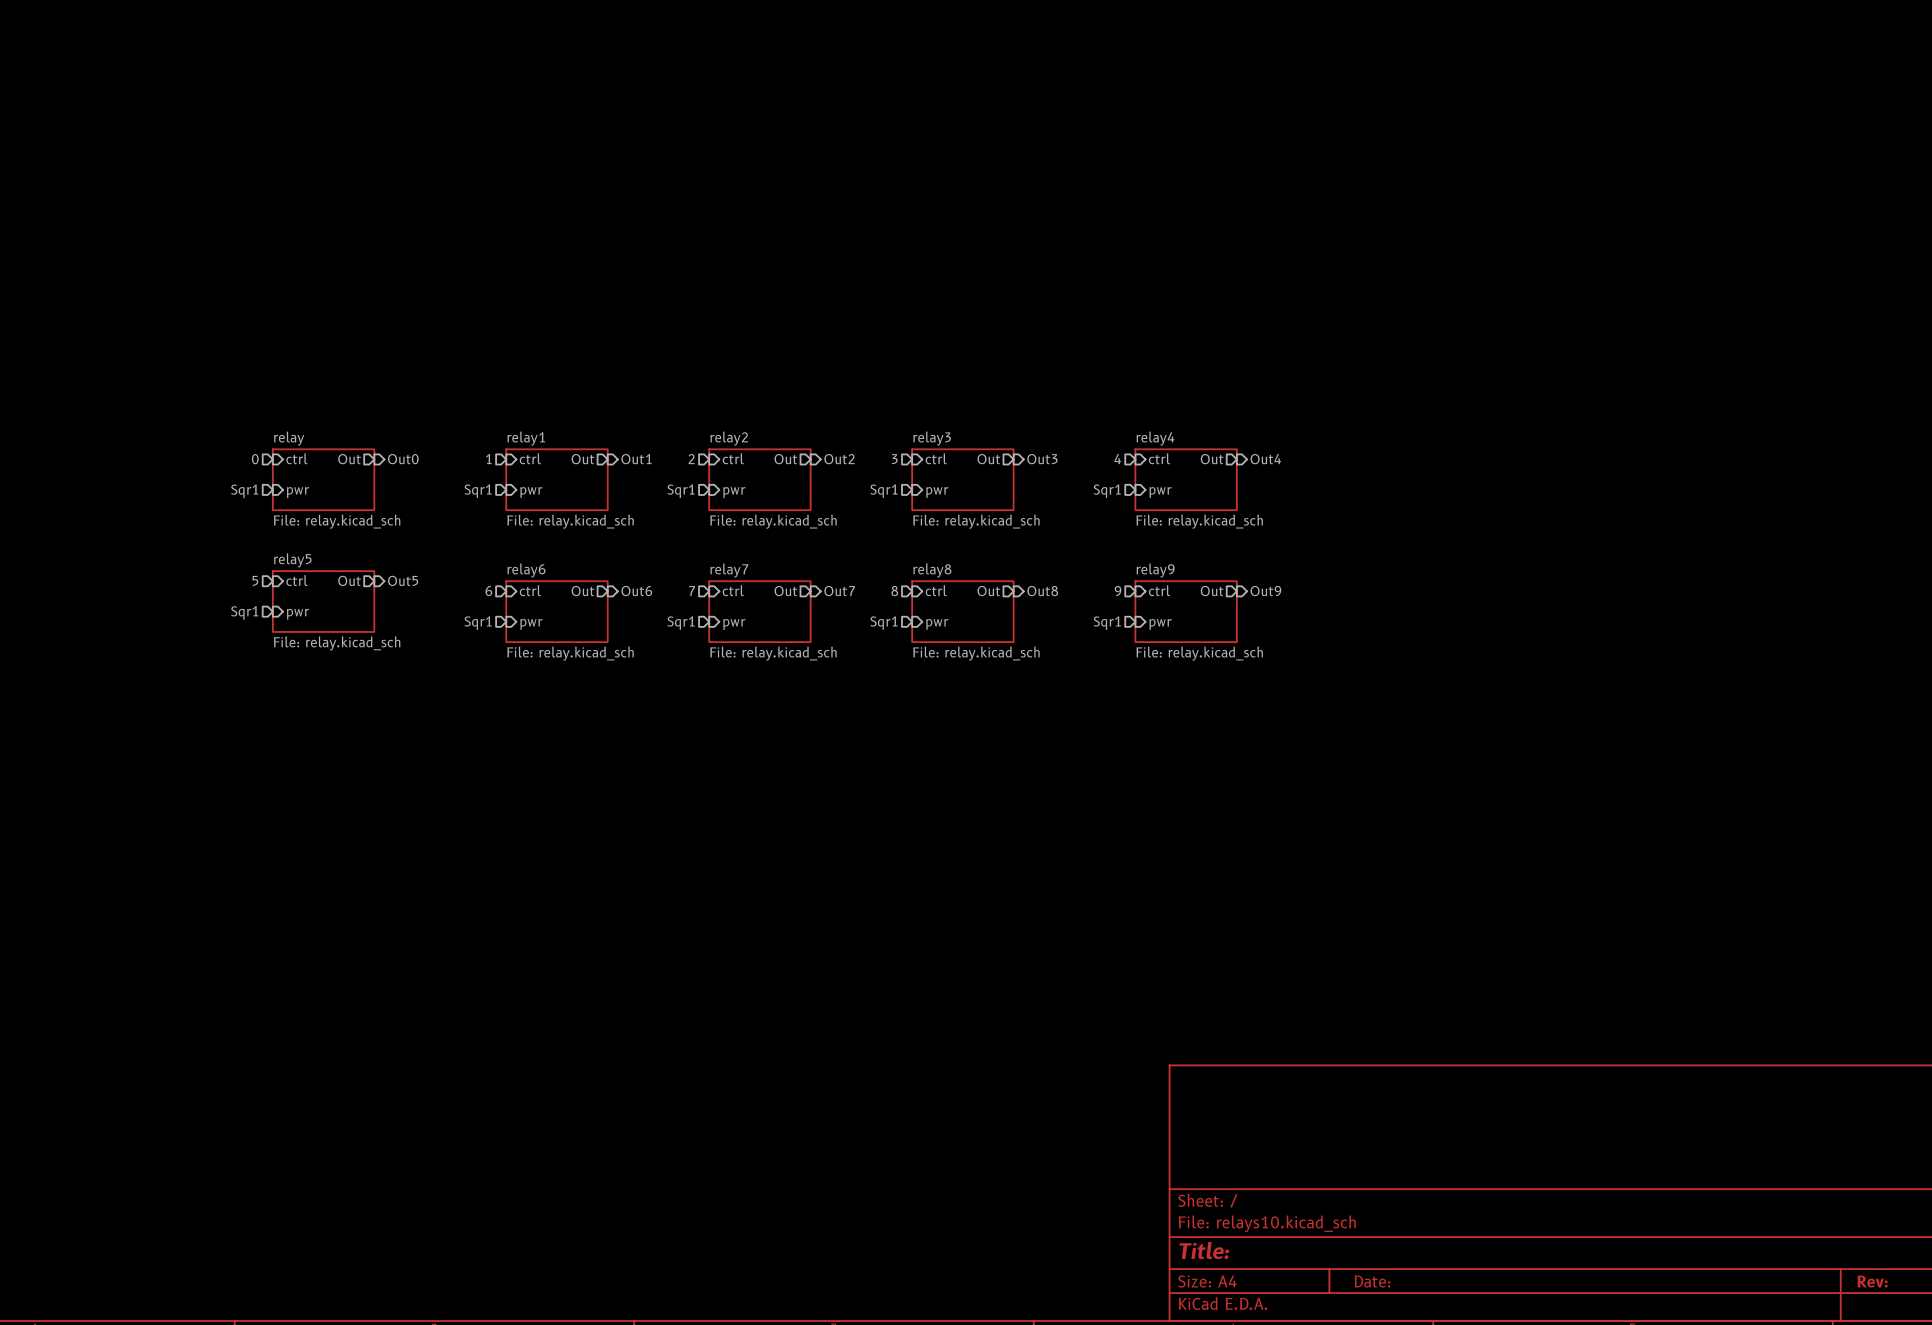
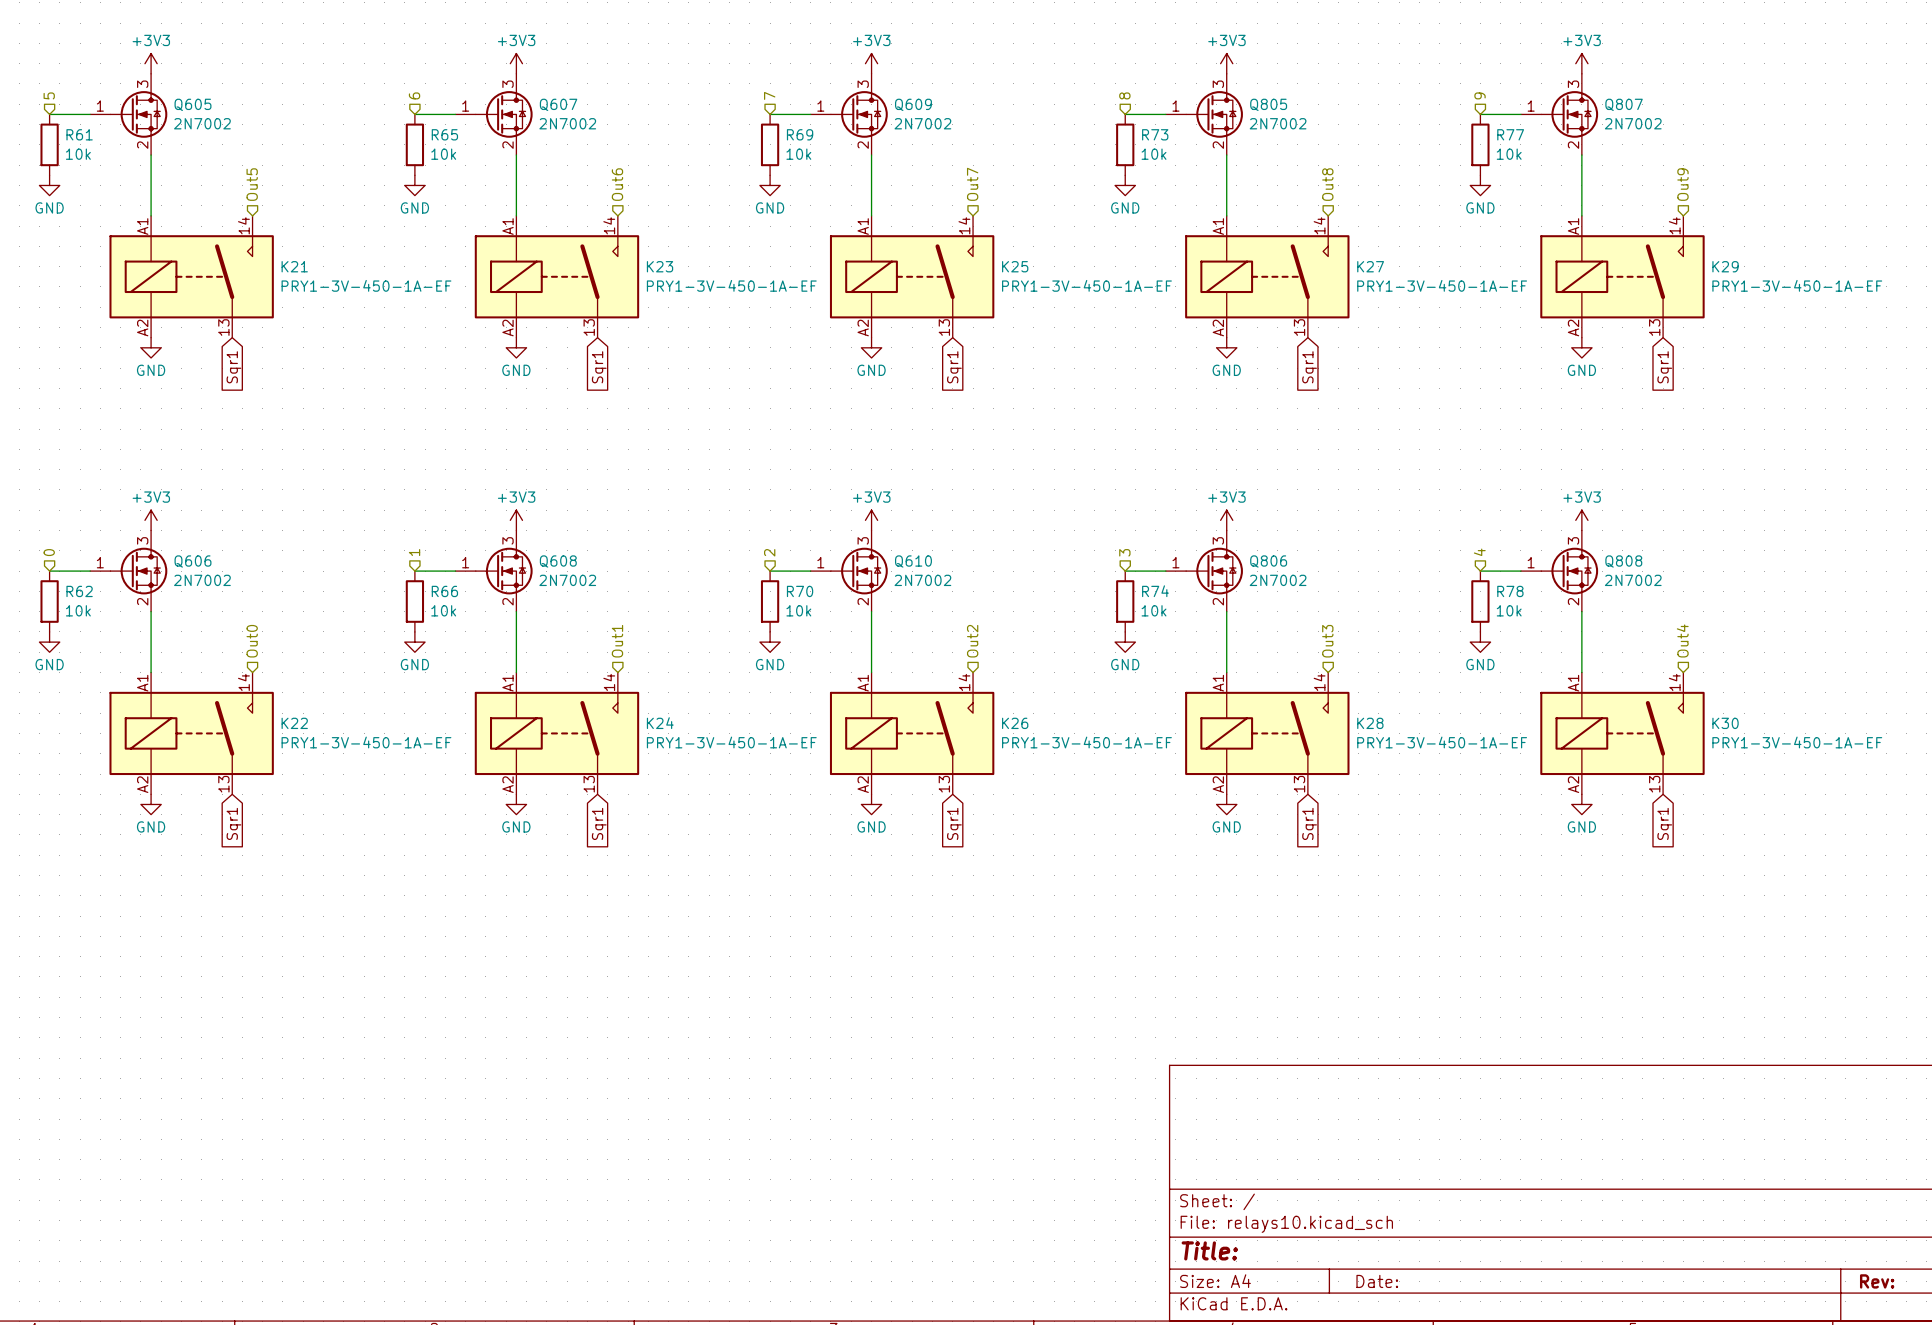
power symbol: none -> +3V3 (151, 63)
power symbol: none -> +3V3 (516, 63)
power symbol: none -> +3V3 (871, 63)
power symbol: none -> +3V3 (1226, 63)
power symbol: none -> +3V3 (1581, 63)
hierarchical label: none -> 5 (49, 95)
hierarchical label: none -> 6 (414, 95)
hierarchical label: none -> 7 (769, 95)
hierarchical label: none -> 8 (1124, 95)
hierarchical label: none -> 9 (1480, 95)
wire: none -> (49, 114) (90, 114)
Q605: none -> 2N7002 (128, 114)
wire: none -> (414, 114) (455, 114)
Q607: none -> 2N7002 (494, 114)
wire: none -> (770, 114) (810, 114)
Q609: none -> 2N7002 (849, 114)
wire: none -> (1125, 114) (1165, 114)
Q805: none -> 2N7002 (1204, 114)
wire: none -> (1480, 114) (1520, 114)
Q807: none -> 2N7002 (1559, 114)
R61: none -> 10k (49, 144)
R65: none -> 10k (414, 144)
R69: none -> 10k (770, 144)
R73: none -> 10k (1125, 144)
R77: none -> 10k (1480, 144)
wire: none -> (151, 155) (151, 215)
wire: none -> (516, 155) (516, 215)
wire: none -> (871, 155) (871, 215)
wire: none -> (1226, 155) (1226, 215)
wire: none -> (1581, 155) (1581, 215)
power symbol: none -> GND (49, 185)
power symbol: none -> GND (414, 185)
power symbol: none -> GND (770, 185)
power symbol: none -> GND (1125, 185)
power symbol: none -> GND (1480, 185)
hierarchical label: none -> Out6 (617, 184)
hierarchical label: none -> Out7 (972, 184)
hierarchical label: none -> Out8 (1327, 184)
hierarchical label: none -> Out9 (1682, 184)
hierarchical label: none -> Out5 (252, 184)
K21: none -> PRY1-3V-450-1A-EF (191, 276)
K23: none -> PRY1-3V-450-1A-EF (556, 276)
K25: none -> PRY1-3V-450-1A-EF (912, 276)
K27: none -> PRY1-3V-450-1A-EF (1267, 276)
K29: none -> PRY1-3V-450-1A-EF (1622, 276)
power symbol: none -> GND (151, 347)
power symbol: none -> GND (516, 347)
power symbol: none -> GND (871, 347)
power symbol: none -> GND (1226, 347)
power symbol: none -> GND (1581, 347)
global label: none -> Sqr1 (233, 367)
global label: none -> Sqr1 (599, 367)
global label: none -> Sqr1 (954, 367)
global label: none -> Sqr1 (1309, 367)
global label: none -> Sqr1 (1664, 367)
sheet pin: ctrl (296, 458) -> none
sheet pin: ctrl (530, 458) -> none
sheet pin: ctrl (733, 458) -> none
sheet pin: ctrl (936, 458) -> none
sheet pin: ctrl (1159, 458) -> none
hierarchical label: 0 (255, 459) -> none
sheet pin: Out (349, 459) -> none
hierarchical label: Out0 (403, 459) -> none
hierarchical label rotation: 0° (488, 459) -> 90° clockwise (414, 552)
hierarchical label position: 1 (488, 459) -> 1 (414, 552)
sheet pin: Out (582, 459) -> none
hierarchical label: Out1 (636, 459) -> none
hierarchical label rotation: 0° (691, 459) -> 90° clockwise (769, 552)
hierarchical label position: 2 (691, 459) -> 2 (769, 552)
sheet pin: Out (785, 459) -> none
hierarchical label: Out2 (839, 459) -> none
hierarchical label: 3 (894, 459) -> none
sheet pin: Out (988, 459) -> none
hierarchical label: Out3 (1042, 459) -> none
hierarchical label: 4 (1117, 459) -> none
sheet pin: Out (1212, 459) -> none
hierarchical label: Out4 (1265, 459) -> none
sheet relay: File: relay.kicad_sch (323, 479) -> none
sheet relay1: File: relay.kicad_sch (556, 479) -> none
sheet relay2: File: relay.kicad_sch (759, 479) -> none
sheet relay3: File: relay.kicad_sch (962, 479) -> none
sheet relay4: File: relay.kicad_sch (1186, 479) -> none
hierarchical label: Sqr1 (244, 491) -> none
hierarchical label: Sqr1 (478, 491) -> none
hierarchical label: Sqr1 (681, 491) -> none
hierarchical label: Sqr1 (884, 491) -> none
hierarchical label: Sqr1 (1107, 491) -> none
sheet pin: pwr (298, 492) -> none
sheet pin: pwr (531, 492) -> none
sheet pin: pwr (734, 492) -> none
sheet pin: pwr (937, 492) -> none
sheet pin: pwr (1160, 492) -> none
power symbol: none -> +3V3 (151, 520)
power symbol: none -> +3V3 (516, 520)
power symbol: none -> +3V3 (871, 520)
power symbol: none -> +3V3 (1226, 520)
power symbol: none -> +3V3 (1581, 520)
hierarchical label: none -> 3 (1124, 552)
hierarchical label: none -> 0 (49, 552)
hierarchical label: none -> 4 (1479, 552)
wire: none -> (49, 571) (90, 571)
Q606: none -> 2N7002 (128, 571)
wire: none -> (414, 571) (455, 571)
Q608: none -> 2N7002 (494, 571)
wire: none -> (770, 571) (810, 571)
Q610: none -> 2N7002 (849, 571)
wire: none -> (1125, 571) (1165, 571)
Q806: none -> 2N7002 (1204, 571)
wire: none -> (1480, 571) (1520, 571)
Q808: none -> 2N7002 (1559, 571)
hierarchical label: 5 (255, 580) -> none
sheet pin: ctrl (296, 580) -> none
sheet pin: Out (349, 580) -> none
hierarchical label: Out5 (403, 580) -> none
sheet pin: ctrl (530, 590) -> none
sheet pin: ctrl (733, 590) -> none
sheet pin: ctrl (936, 590) -> none
sheet pin: ctrl (1159, 590) -> none
hierarchical label: 6 (488, 591) -> none
sheet pin: Out (582, 591) -> none
hierarchical label: Out6 (636, 591) -> none
hierarchical label: 7 (691, 591) -> none
sheet pin: Out (785, 591) -> none
hierarchical label: Out7 (839, 591) -> none
hierarchical label: 8 (894, 591) -> none
sheet pin: Out (988, 591) -> none
hierarchical label: Out8 (1042, 591) -> none
hierarchical label: 9 (1117, 591) -> none
sheet pin: Out (1212, 591) -> none
hierarchical label: Out9 (1265, 591) -> none
R62: none -> 10k (49, 601)
sheet relay5: File: relay.kicad_sch (323, 601) -> none
R66: none -> 10k (414, 601)
R70: none -> 10k (770, 601)
R74: none -> 10k (1125, 601)
R78: none -> 10k (1480, 601)
wire: none -> (151, 611) (151, 672)
wire: none -> (516, 611) (516, 672)
sheet relay6: File: relay.kicad_sch (556, 611) -> none
sheet relay7: File: relay.kicad_sch (759, 611) -> none
wire: none -> (871, 611) (871, 672)
sheet relay8: File: relay.kicad_sch (962, 611) -> none
sheet relay9: File: relay.kicad_sch (1186, 611) -> none
wire: none -> (1226, 611) (1226, 672)
wire: none -> (1581, 611) (1581, 672)
hierarchical label: Sqr1 (244, 612) -> none
sheet pin: pwr (298, 614) -> none
hierarchical label: Sqr1 (478, 623) -> none
hierarchical label: Sqr1 (681, 623) -> none
hierarchical label: Sqr1 (884, 623) -> none
hierarchical label: Sqr1 (1107, 623) -> none
sheet pin: pwr (531, 624) -> none
sheet pin: pwr (734, 624) -> none
sheet pin: pwr (937, 624) -> none
sheet pin: pwr (1160, 624) -> none
power symbol: none -> GND (49, 642)
power symbol: none -> GND (414, 642)
power symbol: none -> GND (770, 642)
power symbol: none -> GND (1125, 642)
power symbol: none -> GND (1480, 642)
hierarchical label: none -> Out0 (252, 641)
hierarchical label: none -> Out1 (617, 641)
hierarchical label: none -> Out2 (972, 641)
hierarchical label: none -> Out3 (1327, 641)
hierarchical label: none -> Out4 (1682, 640)
K22: none -> PRY1-3V-450-1A-EF (191, 733)
K24: none -> PRY1-3V-450-1A-EF (556, 733)
K26: none -> PRY1-3V-450-1A-EF (912, 733)
K28: none -> PRY1-3V-450-1A-EF (1267, 733)
K30: none -> PRY1-3V-450-1A-EF (1622, 733)
power symbol: none -> GND (151, 804)
power symbol: none -> GND (516, 804)
power symbol: none -> GND (871, 804)
power symbol: none -> GND (1226, 804)
power symbol: none -> GND (1581, 804)
global label: none -> Sqr1 (233, 823)
global label: none -> Sqr1 (599, 823)
global label: none -> Sqr1 (954, 823)
global label: none -> Sqr1 (1309, 823)
global label: none -> Sqr1 (1664, 823)

